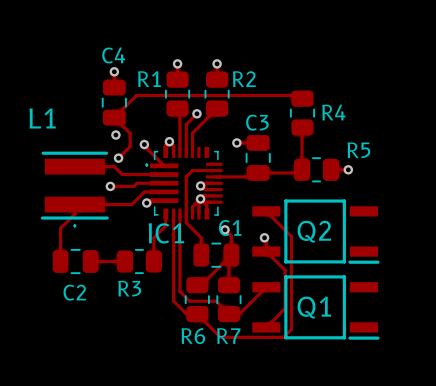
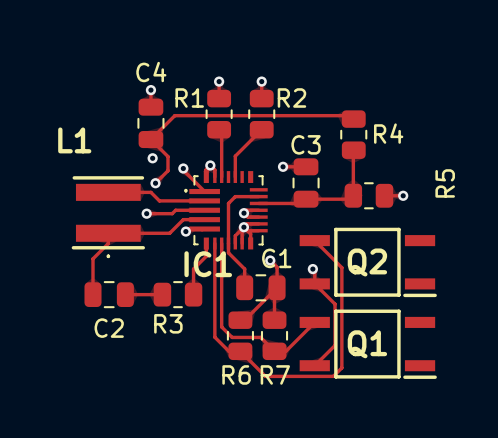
track: (196, 113) (186, 124) (186, 152) -> none
via: (196, 113) -> none
R5 name rotation: 0° (358, 150) -> 90° counterclockwise (445, 183)

